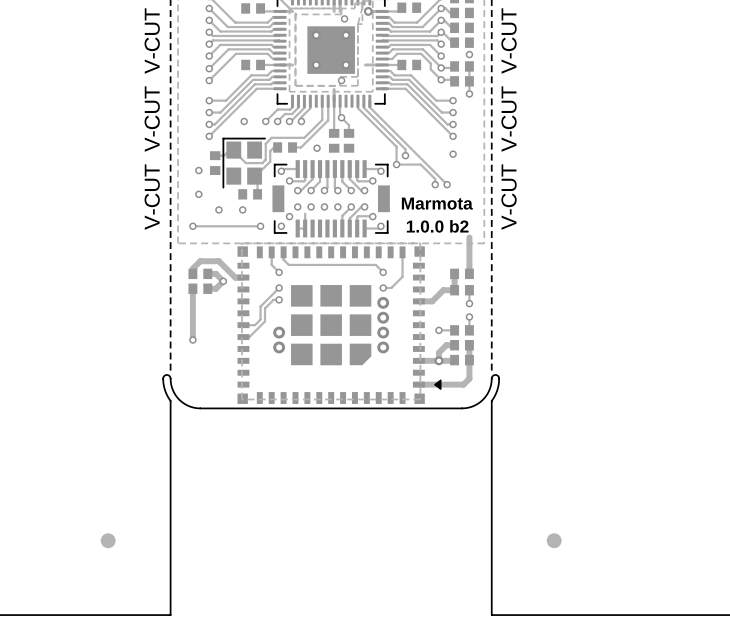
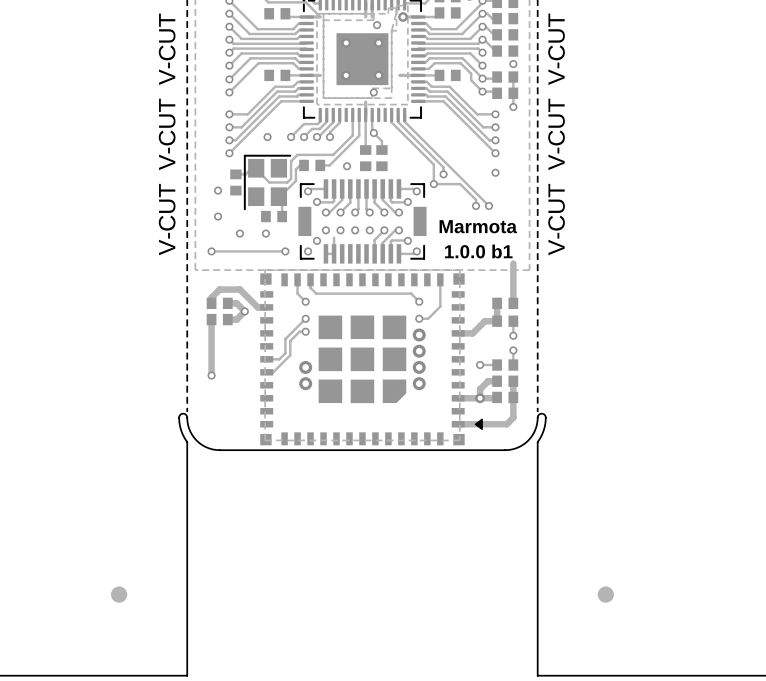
text: 1.0.0 b2 (437, 226) -> 1.0.0 b1 (478, 251)

